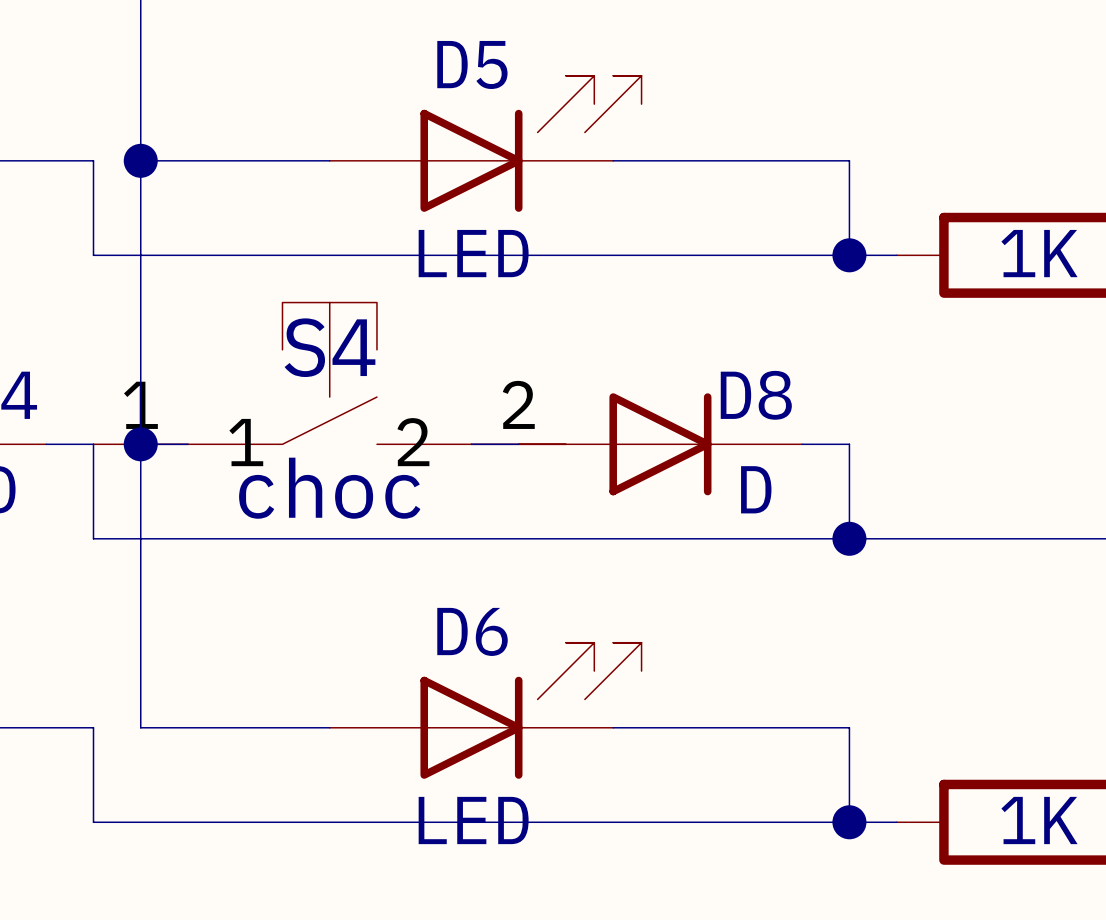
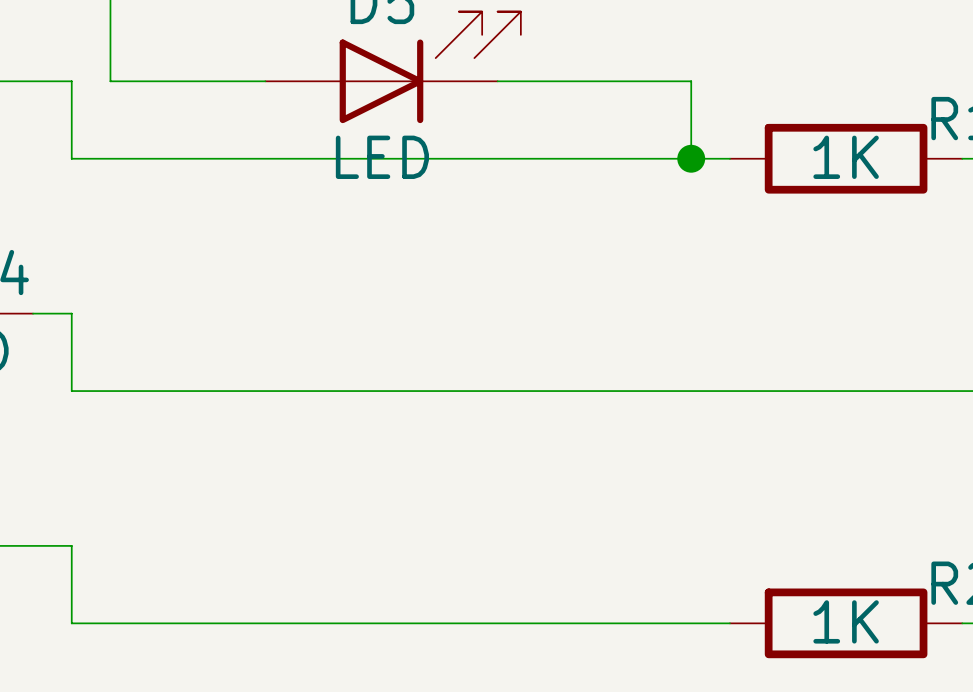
wire: (140, 160) (140, 727) (329, 727) -> none
junction: (140, 160) -> none
S4: choc (329, 373) -> none
wire: (140, 444) (187, 444) -> none
junction: (140, 444) -> none
wire: (471, 444) (518, 444) -> none
D8: D (660, 444) -> none
wire: (802, 444) (849, 444) (849, 538) -> none
junction: (849, 538) -> none
D6: LED (485, 710) -> none
wire: (613, 727) (849, 727) (849, 822) -> none
junction: (849, 822) -> none

